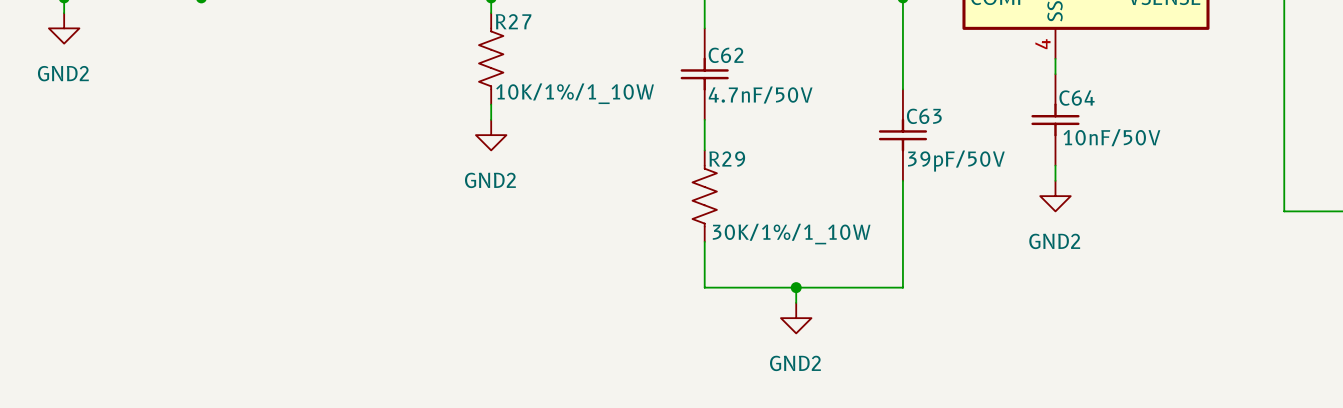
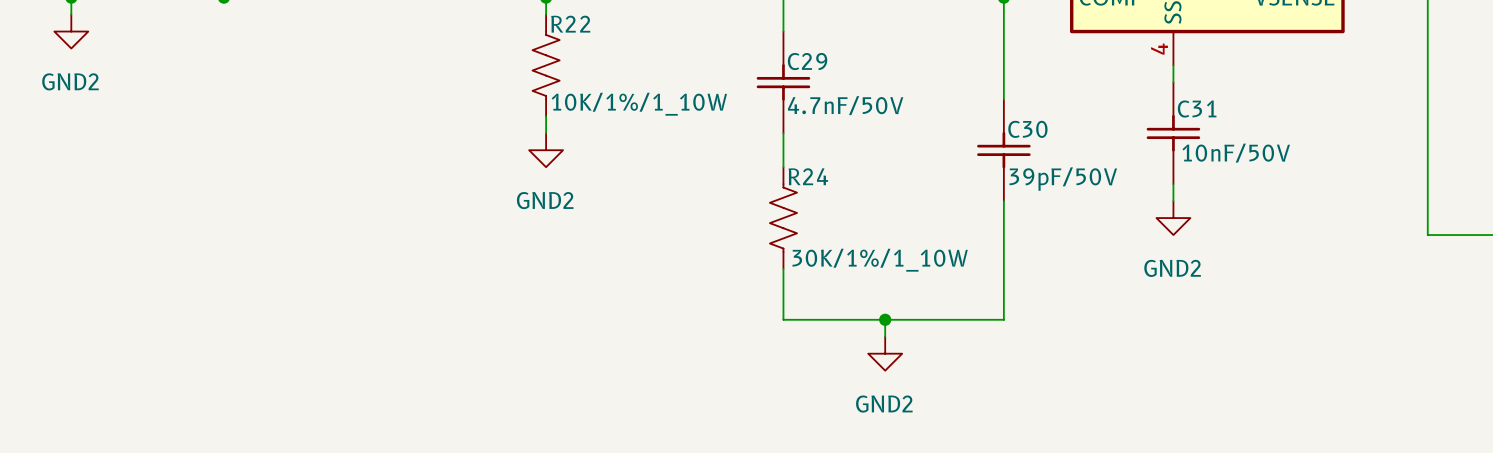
R27 name: R27 (513, 21) -> R22 (570, 24)
C62 name: C62 (726, 55) -> C29 (807, 61)
C64 name: C64 (1077, 98) -> C31 (1197, 109)
C63 name: C63 (924, 116) -> C30 (1027, 129)
R29 name: R29 (727, 159) -> R24 (808, 176)

